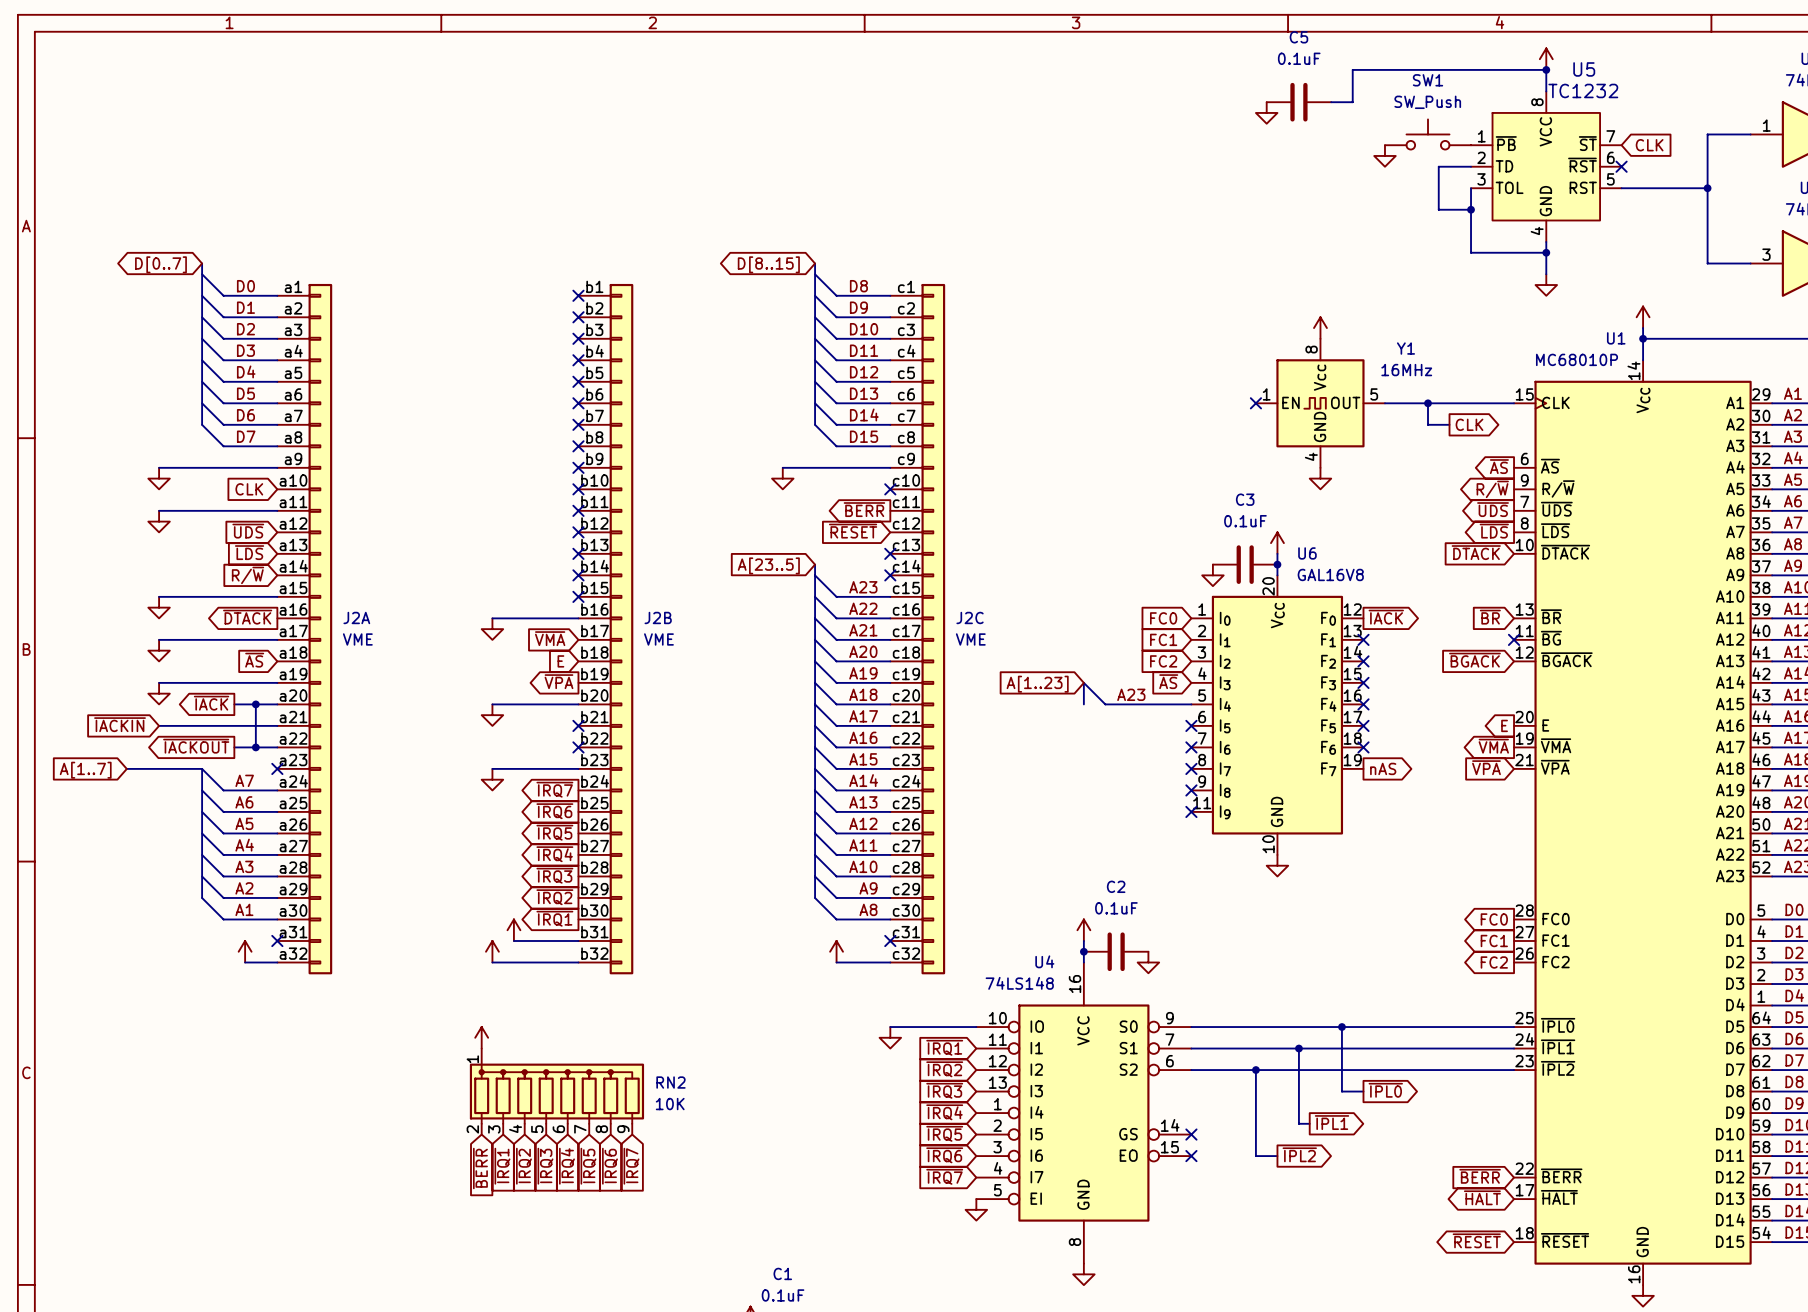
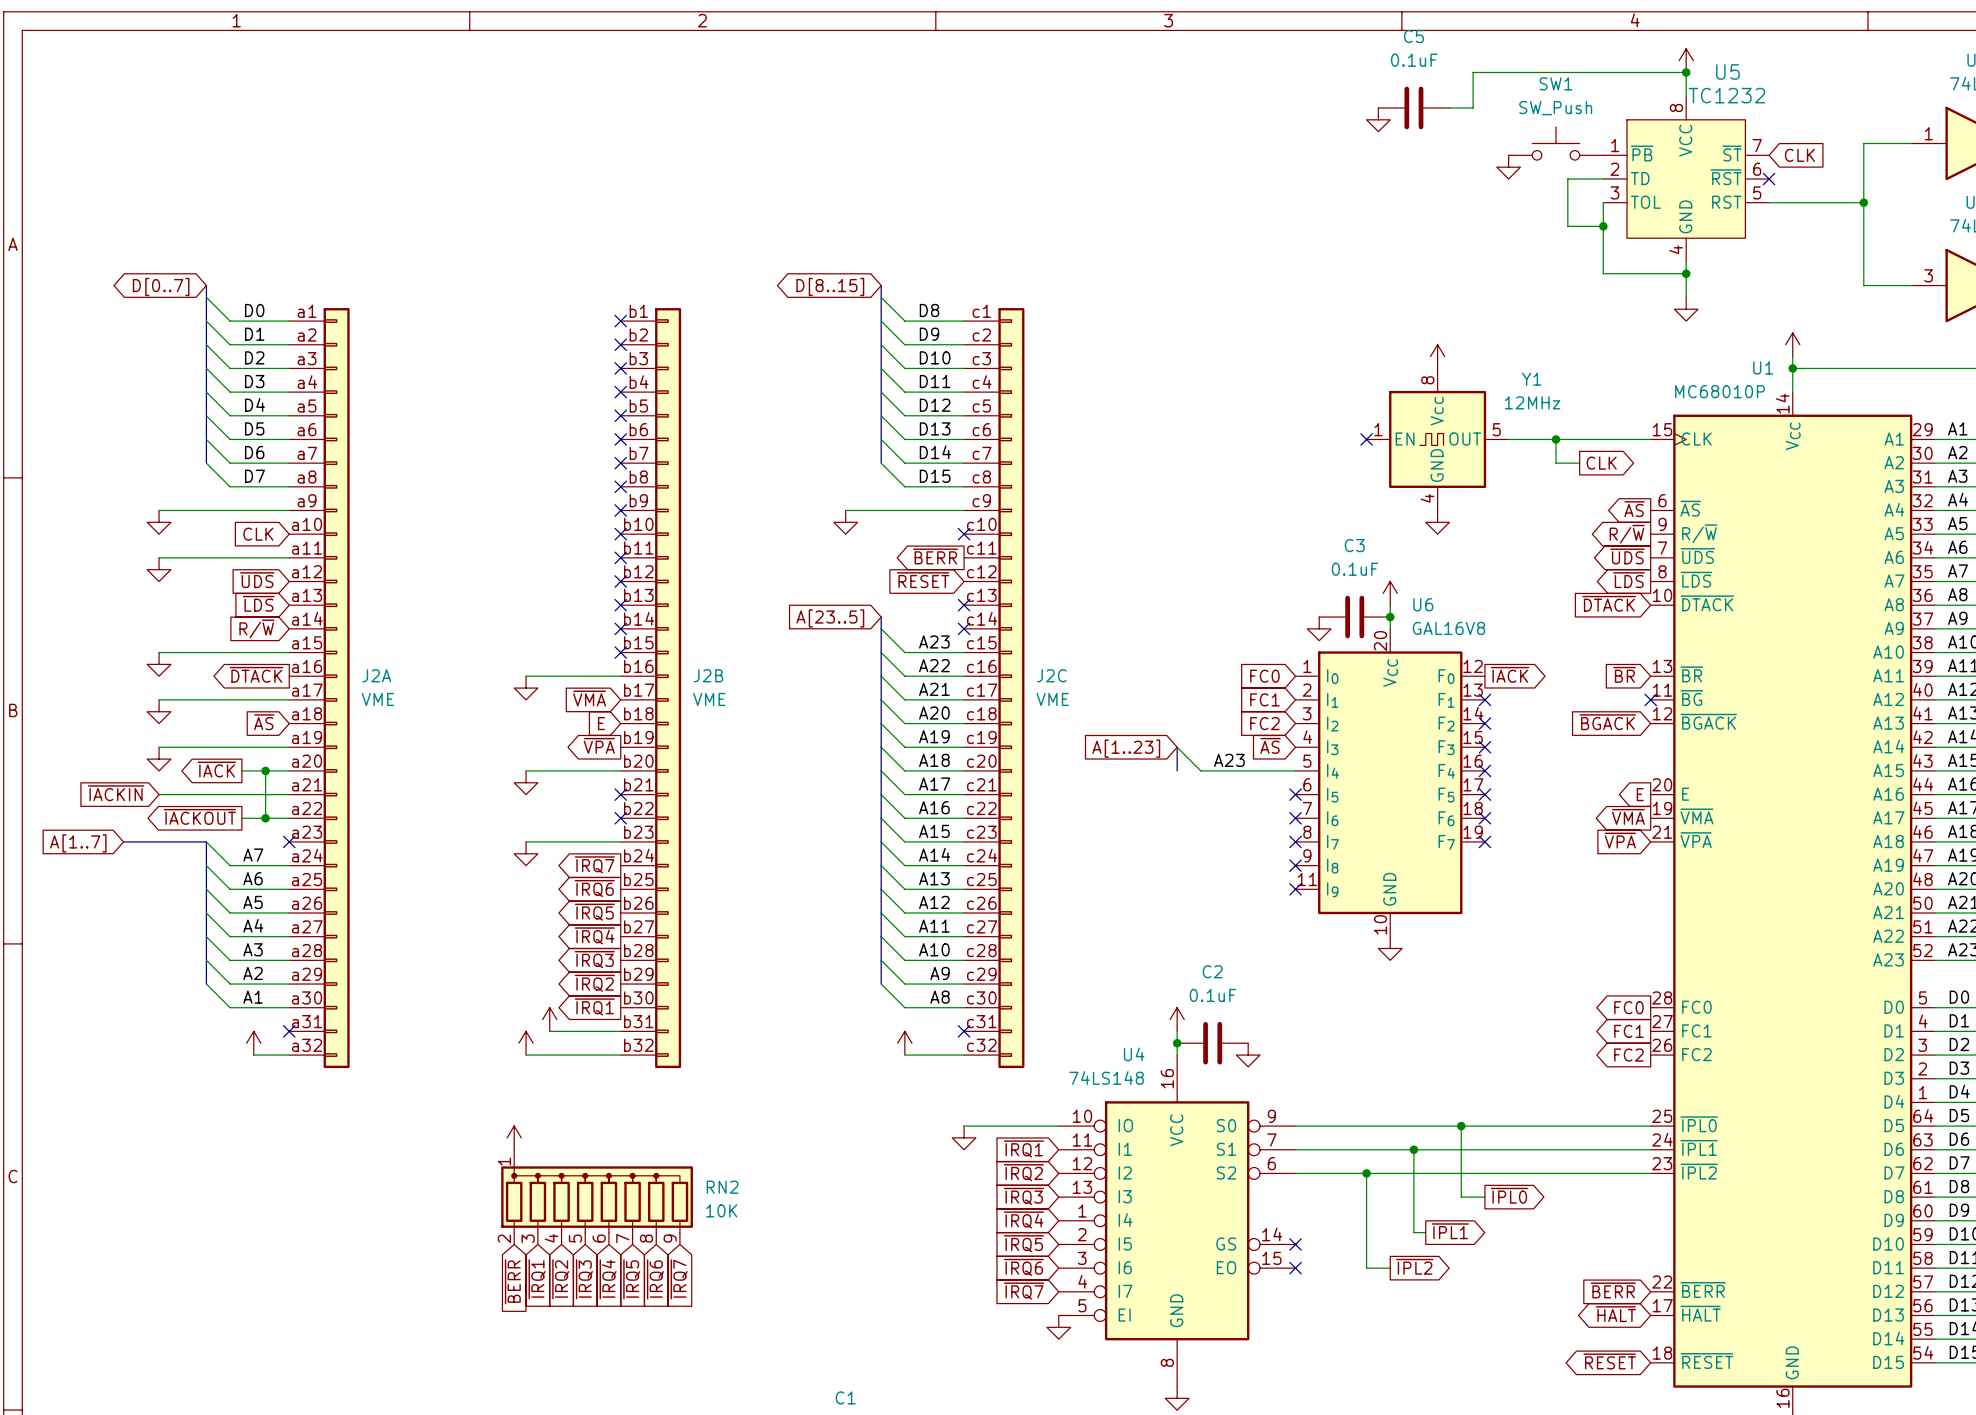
Y1 value: 16MHz (1406, 370) -> 12MHz (1532, 402)
no-connect mark: none -> (1484, 841)
global label: nAS (1383, 768) -> none

